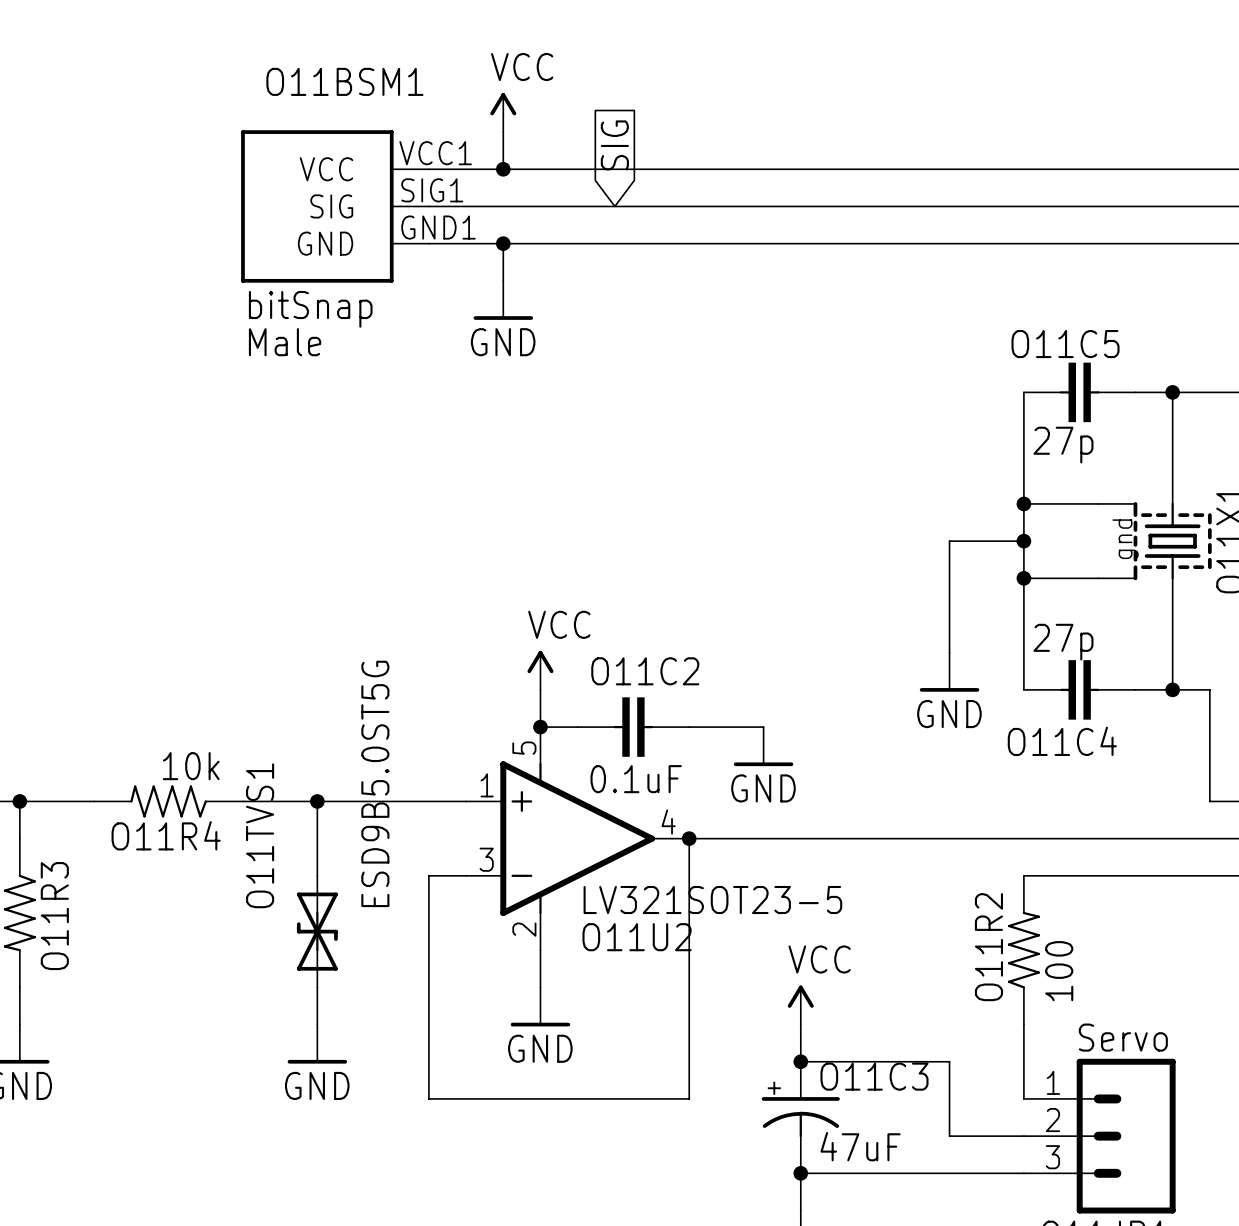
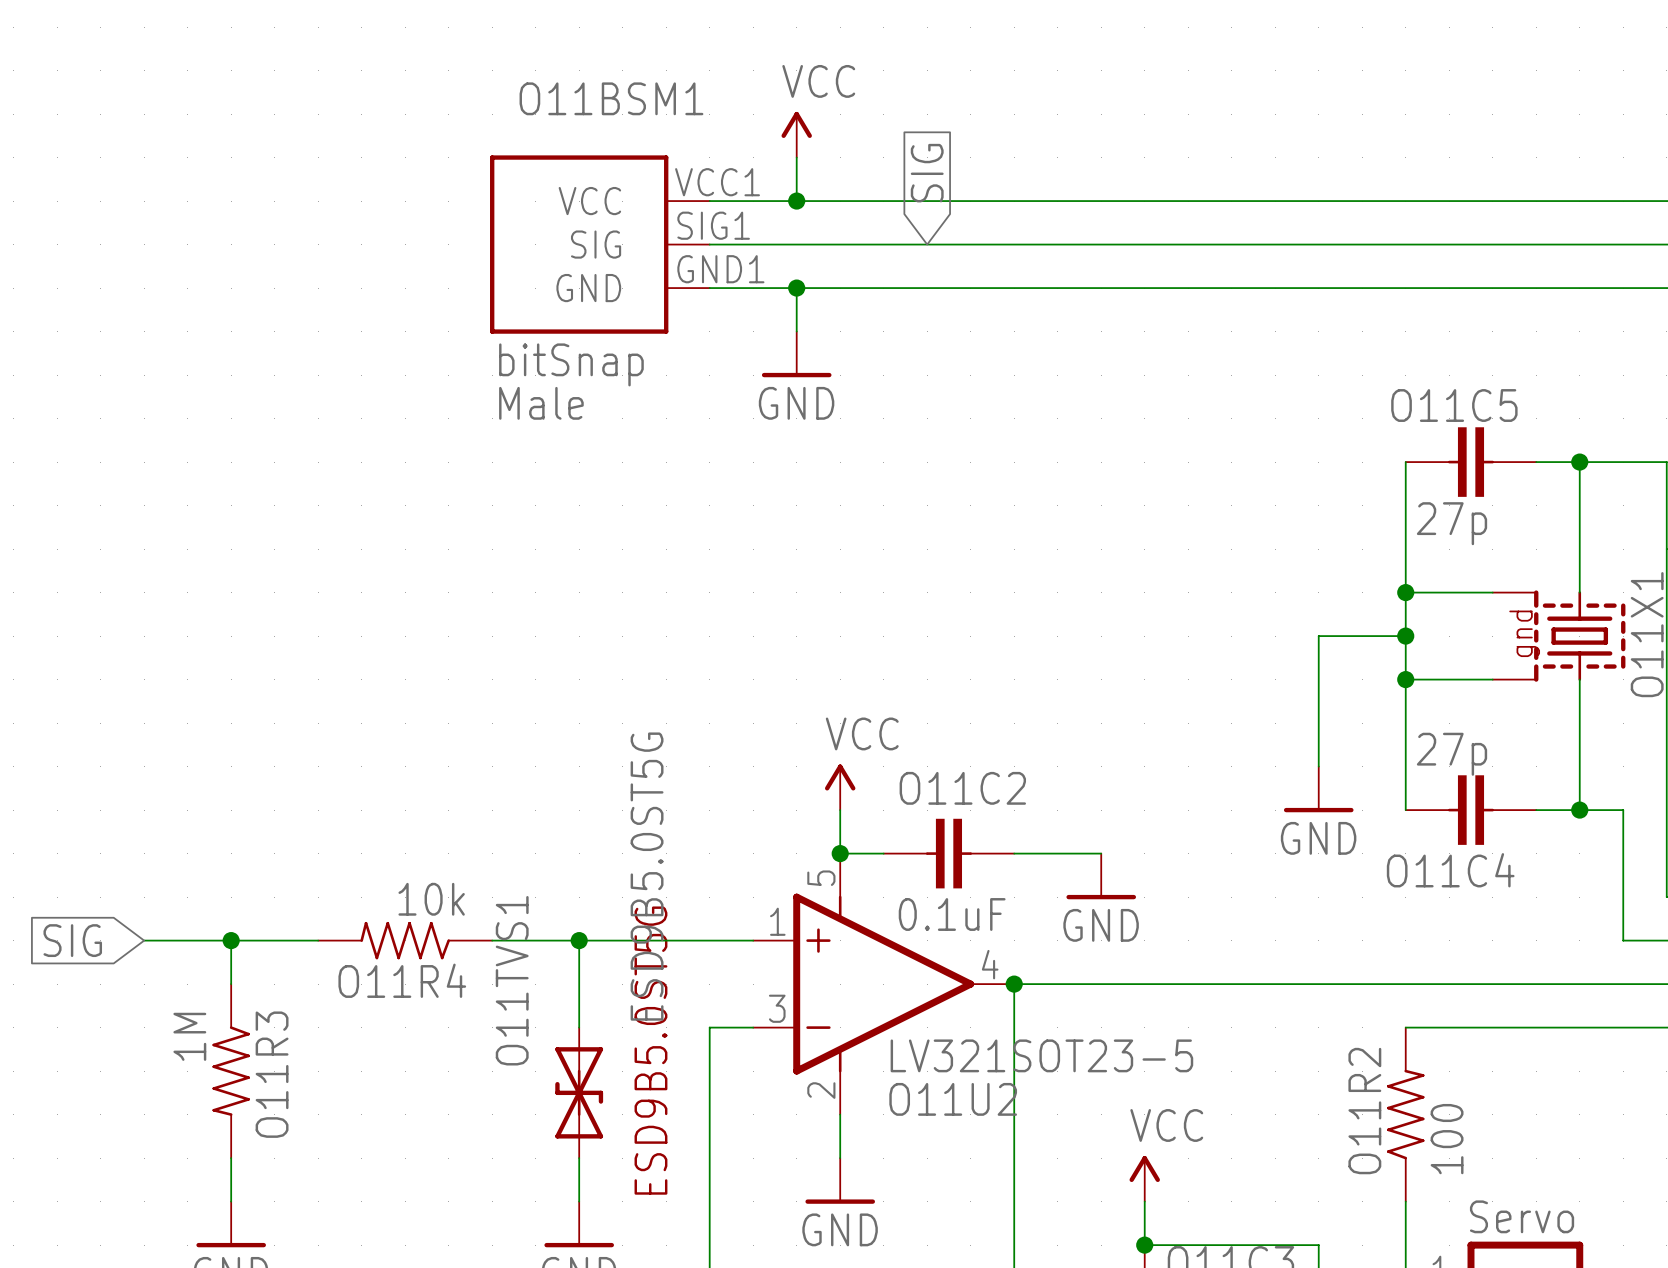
O11TVS1 value position: ESD9B5.0ST5G (375, 783) -> ESD9B5.0ST5G (647, 876)
O11TVS1 text: none -> ESD9B5.0ST5G (650, 1050)

